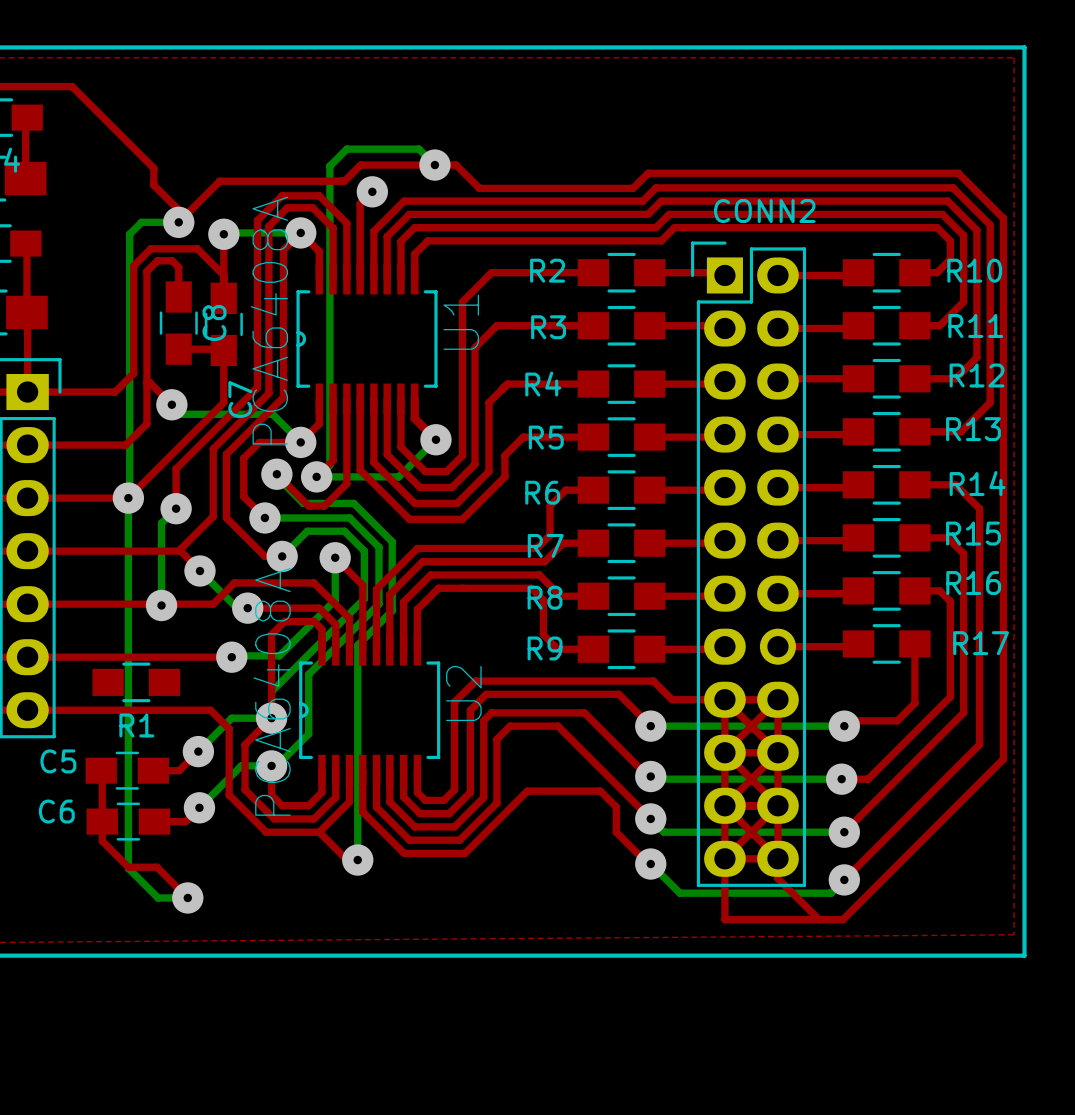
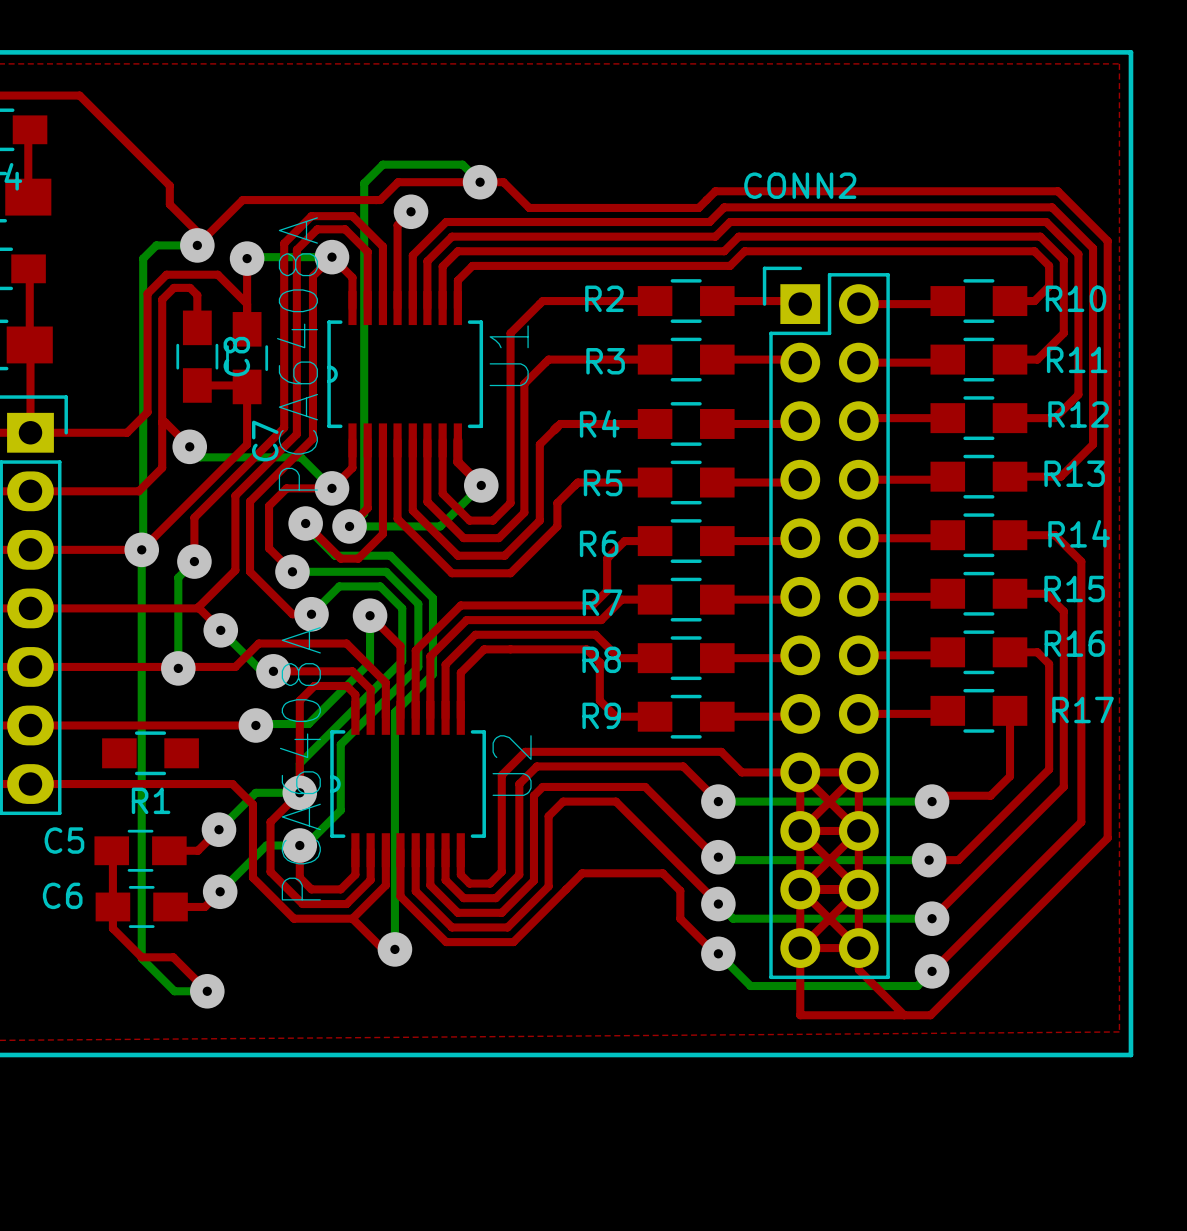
CONN2 name position: CONN2 (764, 211) -> CONN2 (800, 185)
CONN2 footprint: [691, 241, 807, 887] -> [762, 266, 890, 980]

